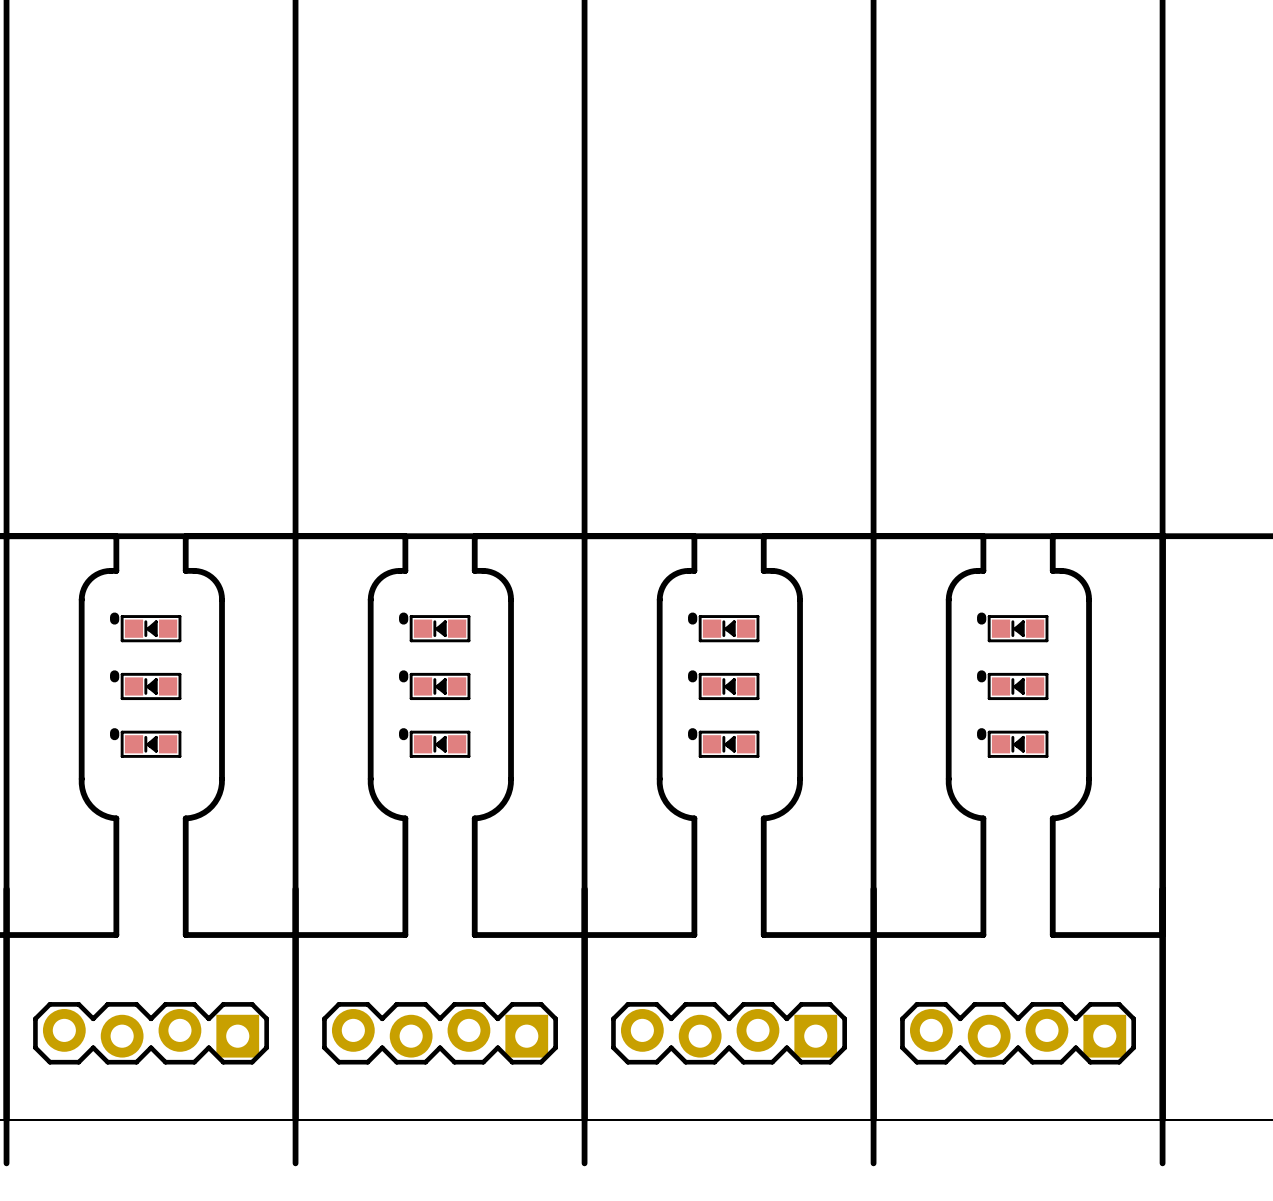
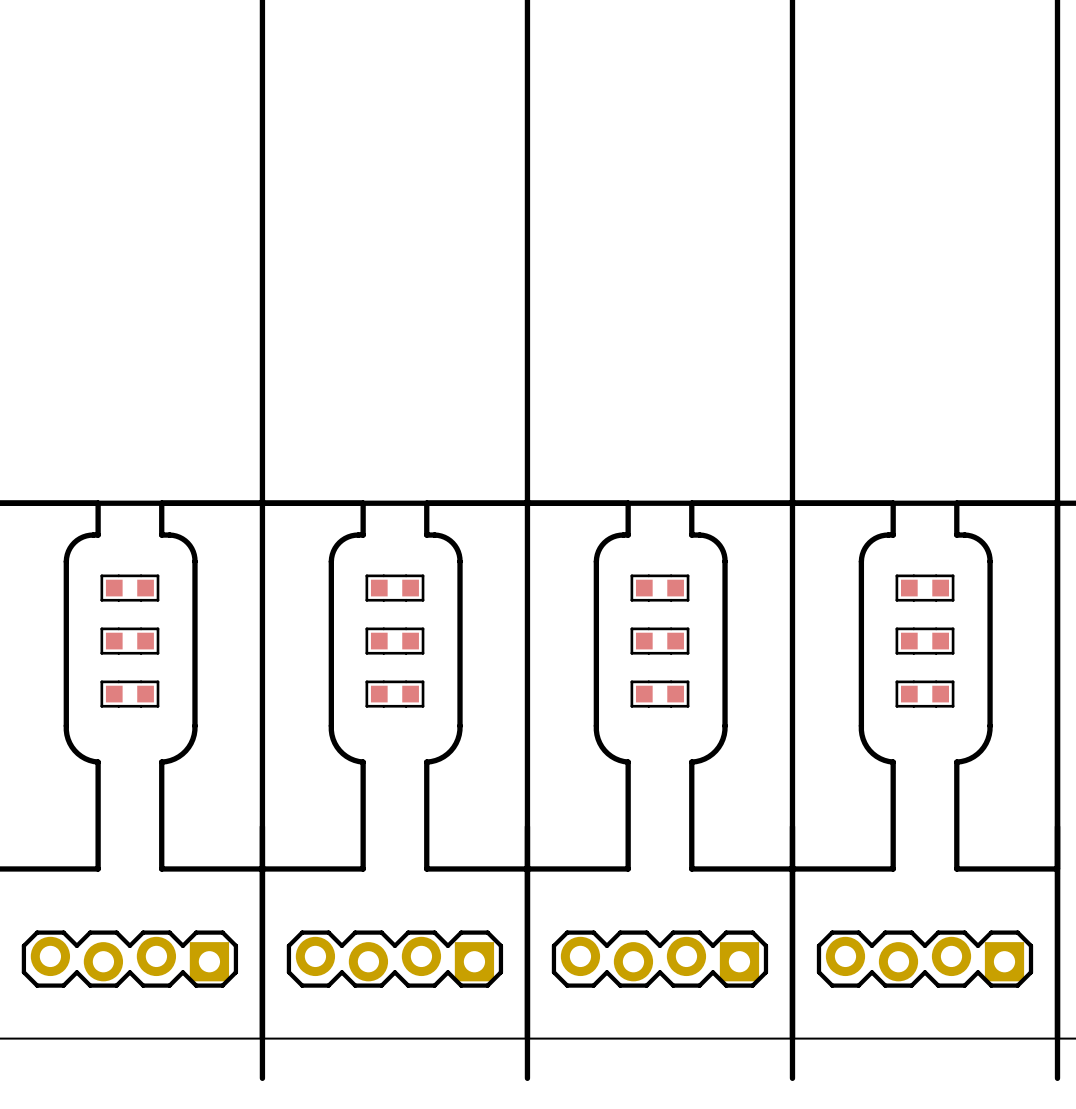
part footprint: [110, 612, 182, 643] -> [100, 574, 160, 602]
part footprint: [399, 612, 471, 643] -> [365, 574, 425, 602]
part footprint: [688, 612, 760, 643] -> [630, 574, 690, 602]
part footprint: [977, 612, 1049, 643] -> [895, 574, 955, 602]
part footprint: [110, 670, 182, 701] -> [100, 627, 160, 655]
part footprint: [399, 670, 471, 701] -> [365, 627, 425, 655]
part footprint: [688, 670, 760, 701] -> [630, 627, 690, 655]
part footprint: [977, 670, 1049, 701] -> [895, 627, 955, 655]
part footprint: [110, 728, 182, 758] -> [100, 680, 160, 708]
part footprint: [399, 728, 471, 758] -> [365, 680, 425, 708]
part footprint: [688, 728, 760, 758] -> [630, 680, 690, 708]
part footprint: [977, 728, 1049, 758] -> [895, 680, 955, 708]

